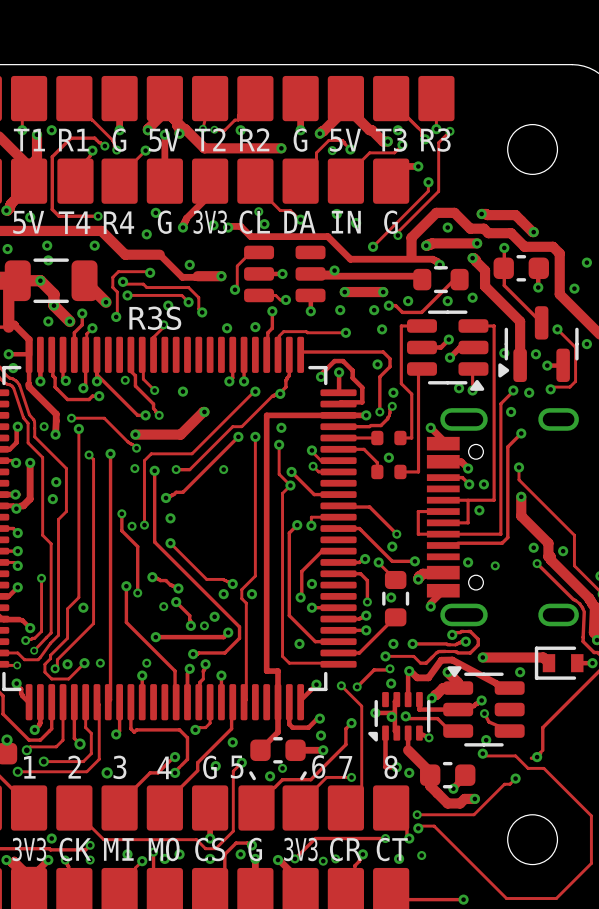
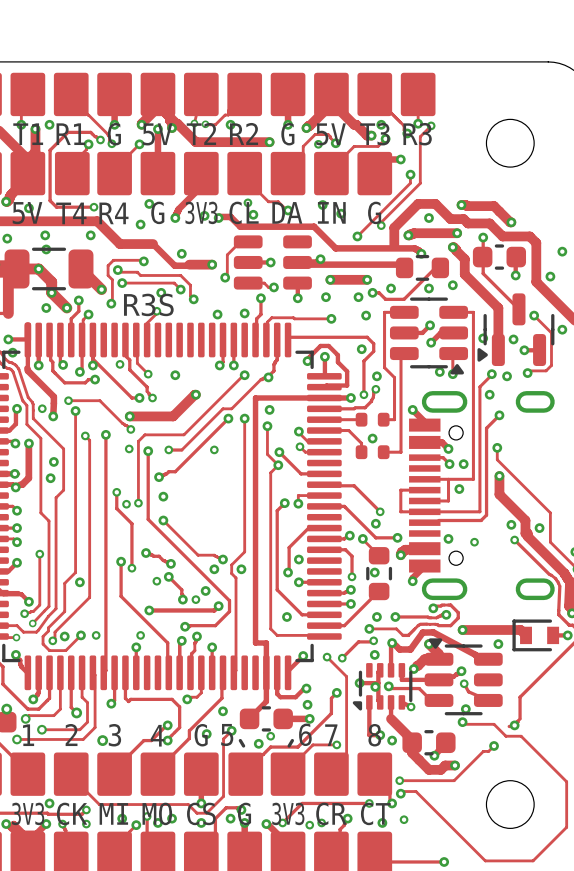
track: (14, 323) (29, 339) -> none

